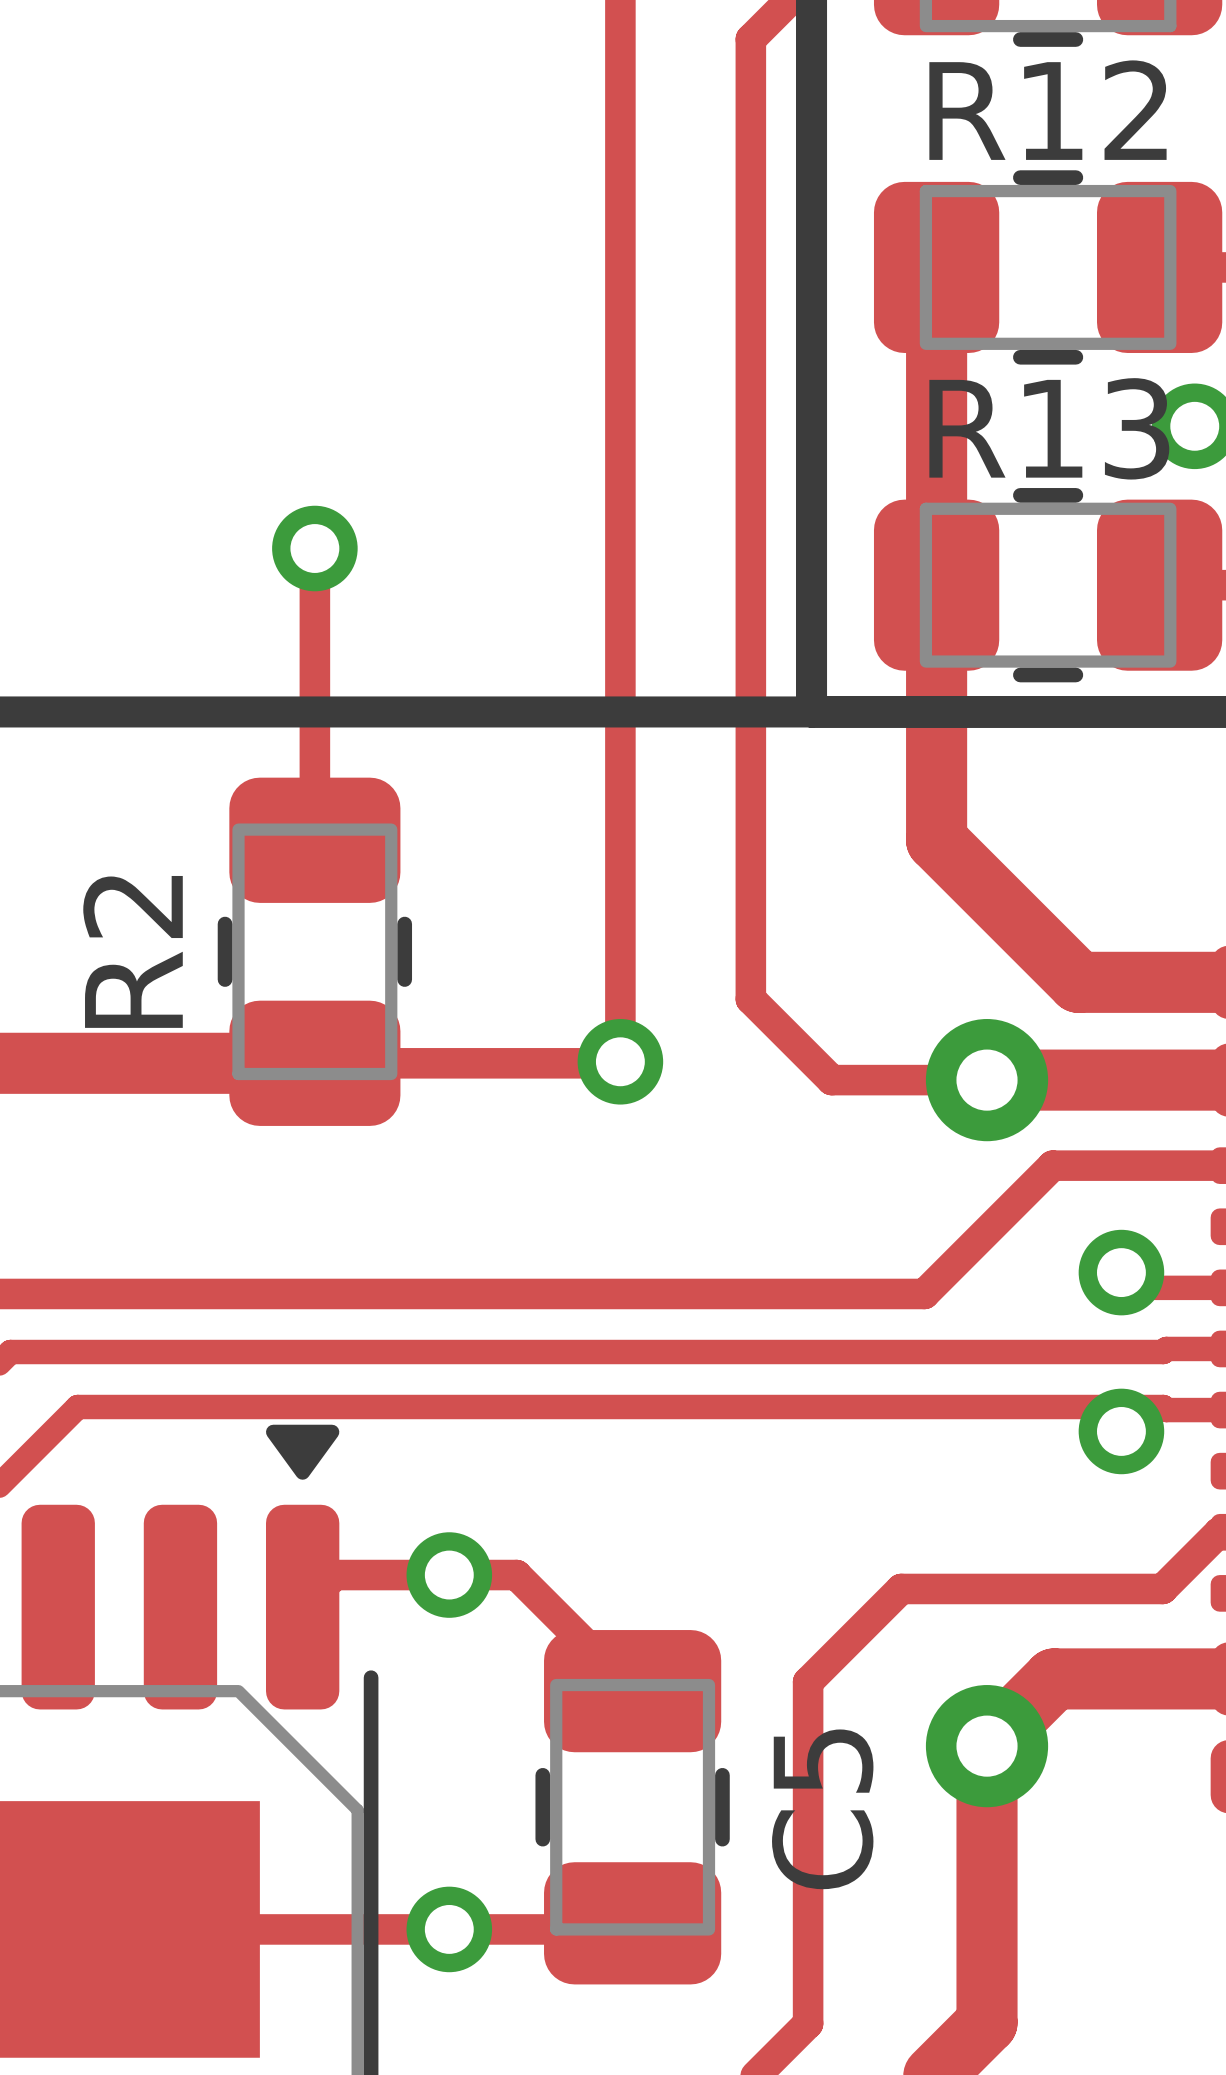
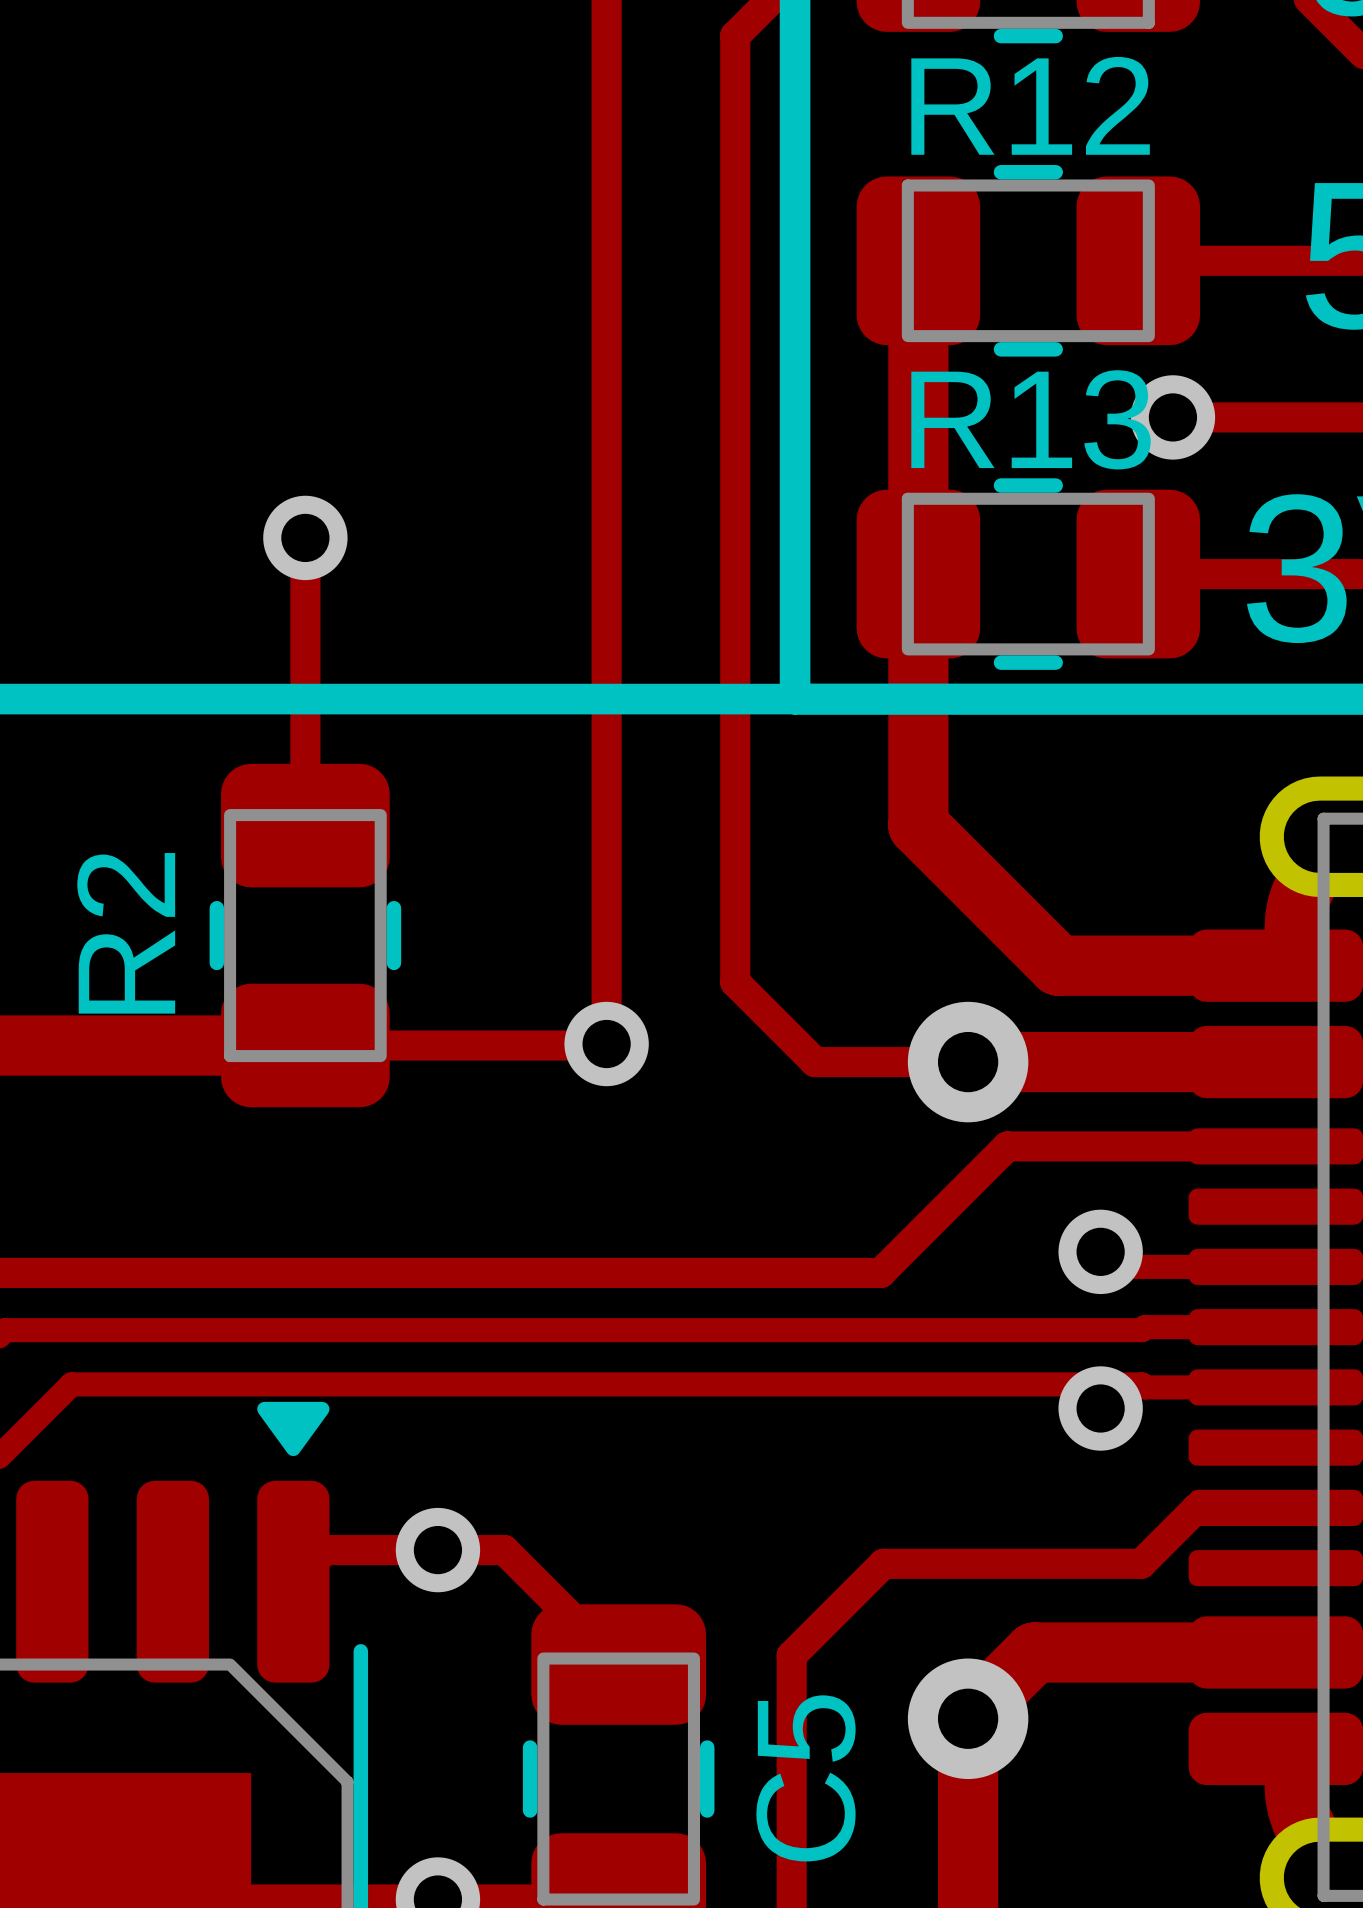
track: (1052, 1165) (924, 1293) (898, 1293) -> (1032, 1146) (1007, 1146) (880, 1272)

